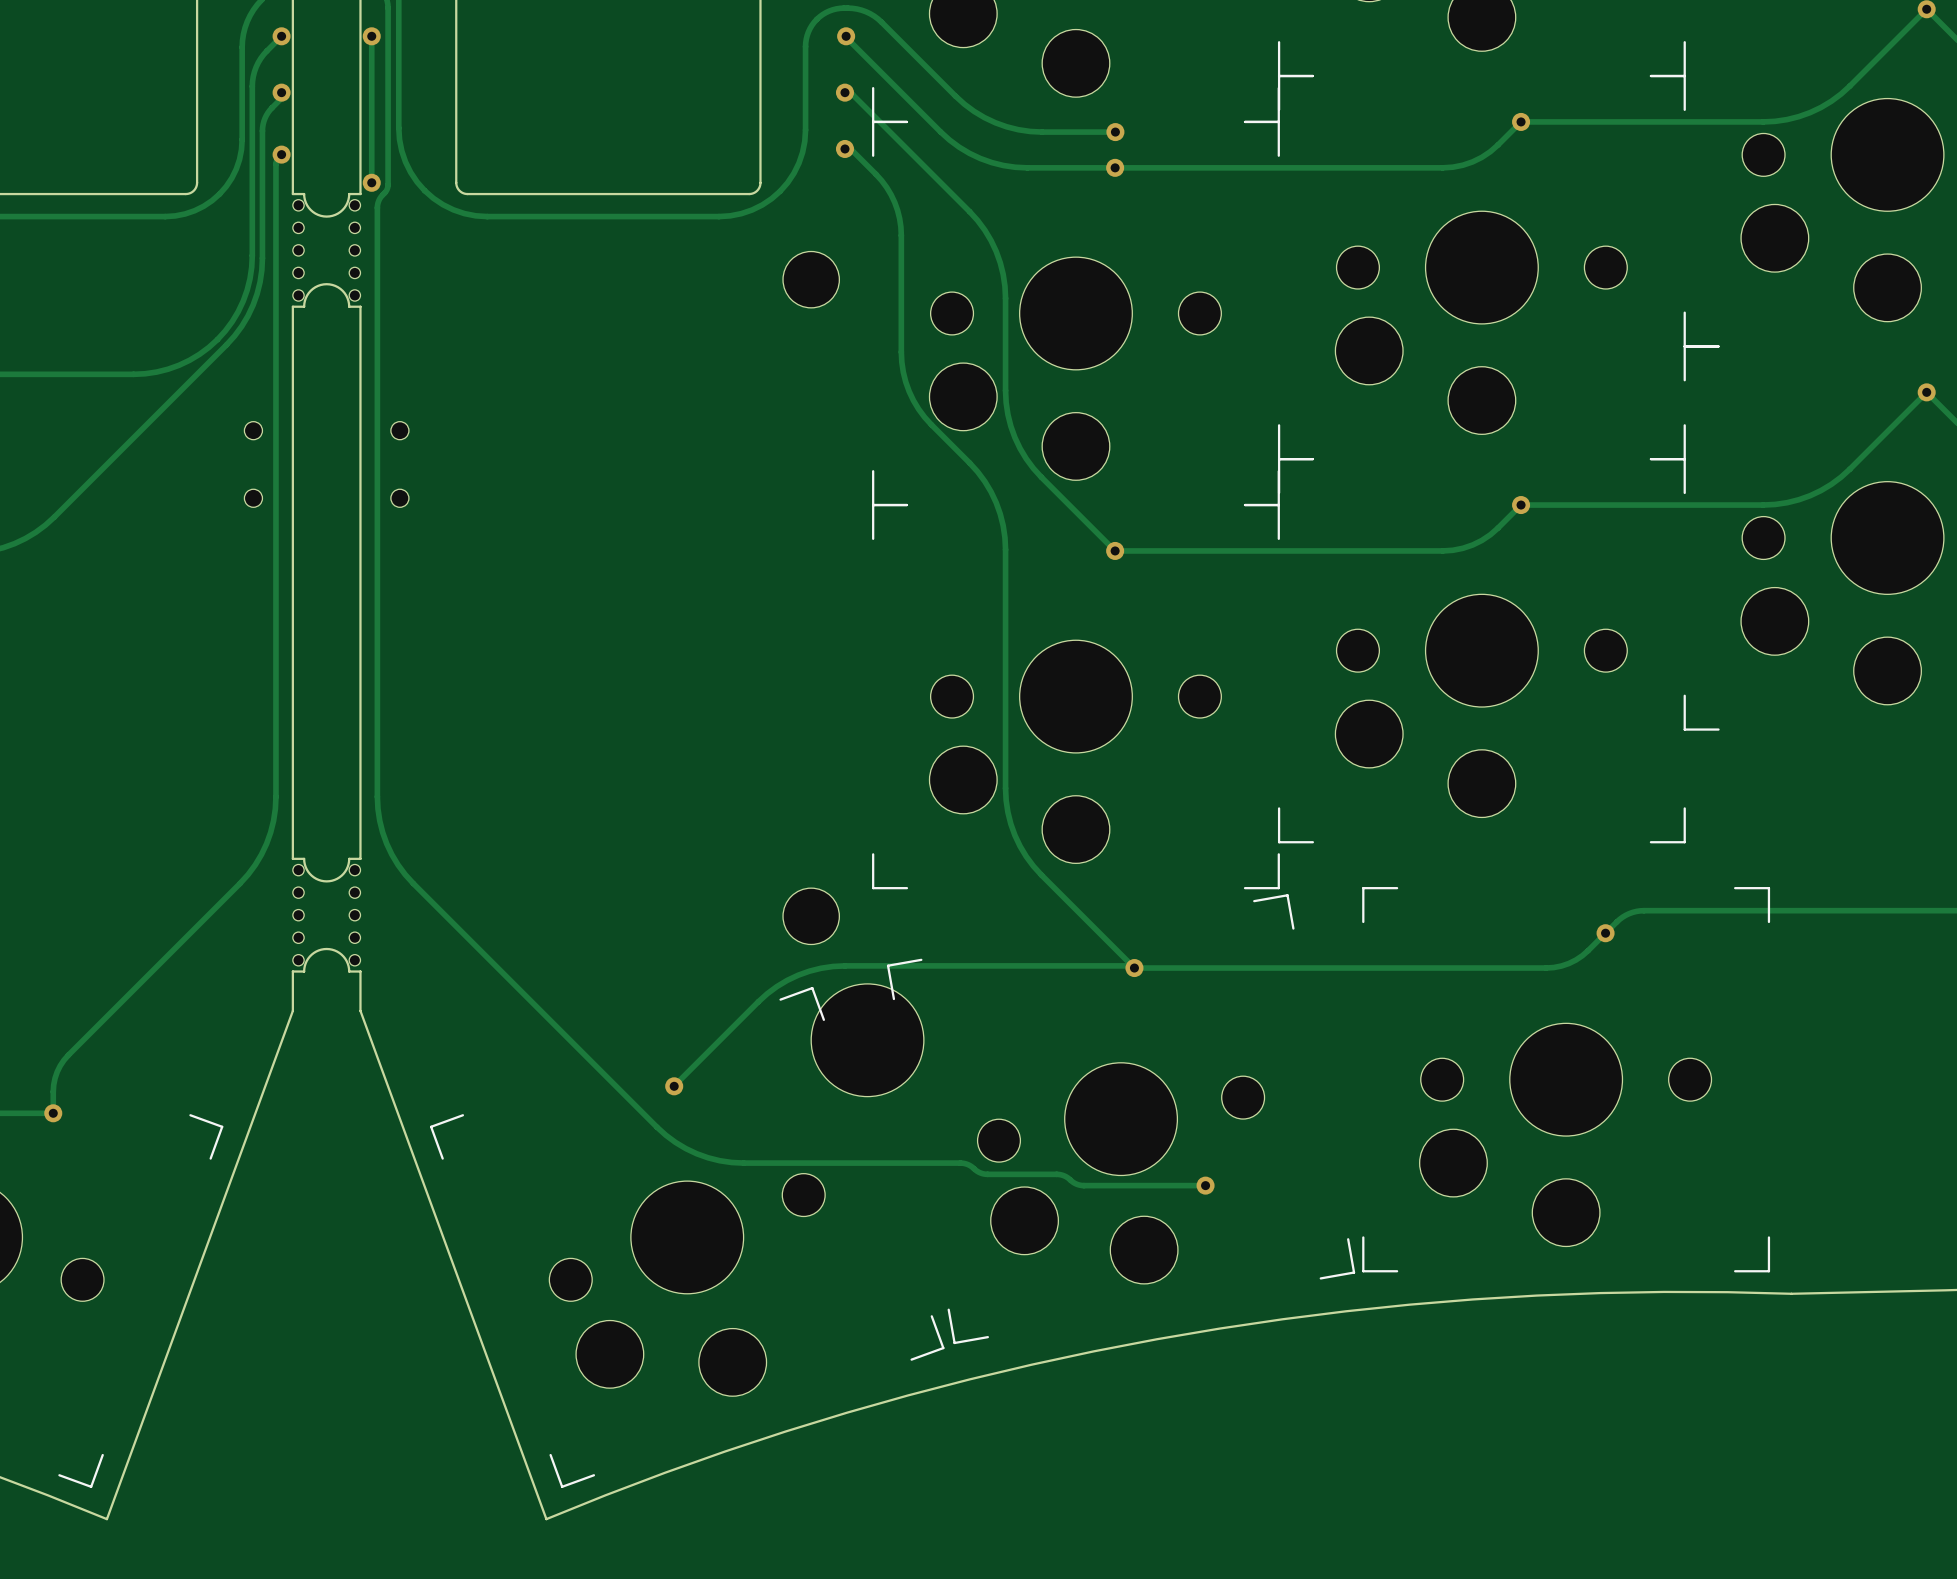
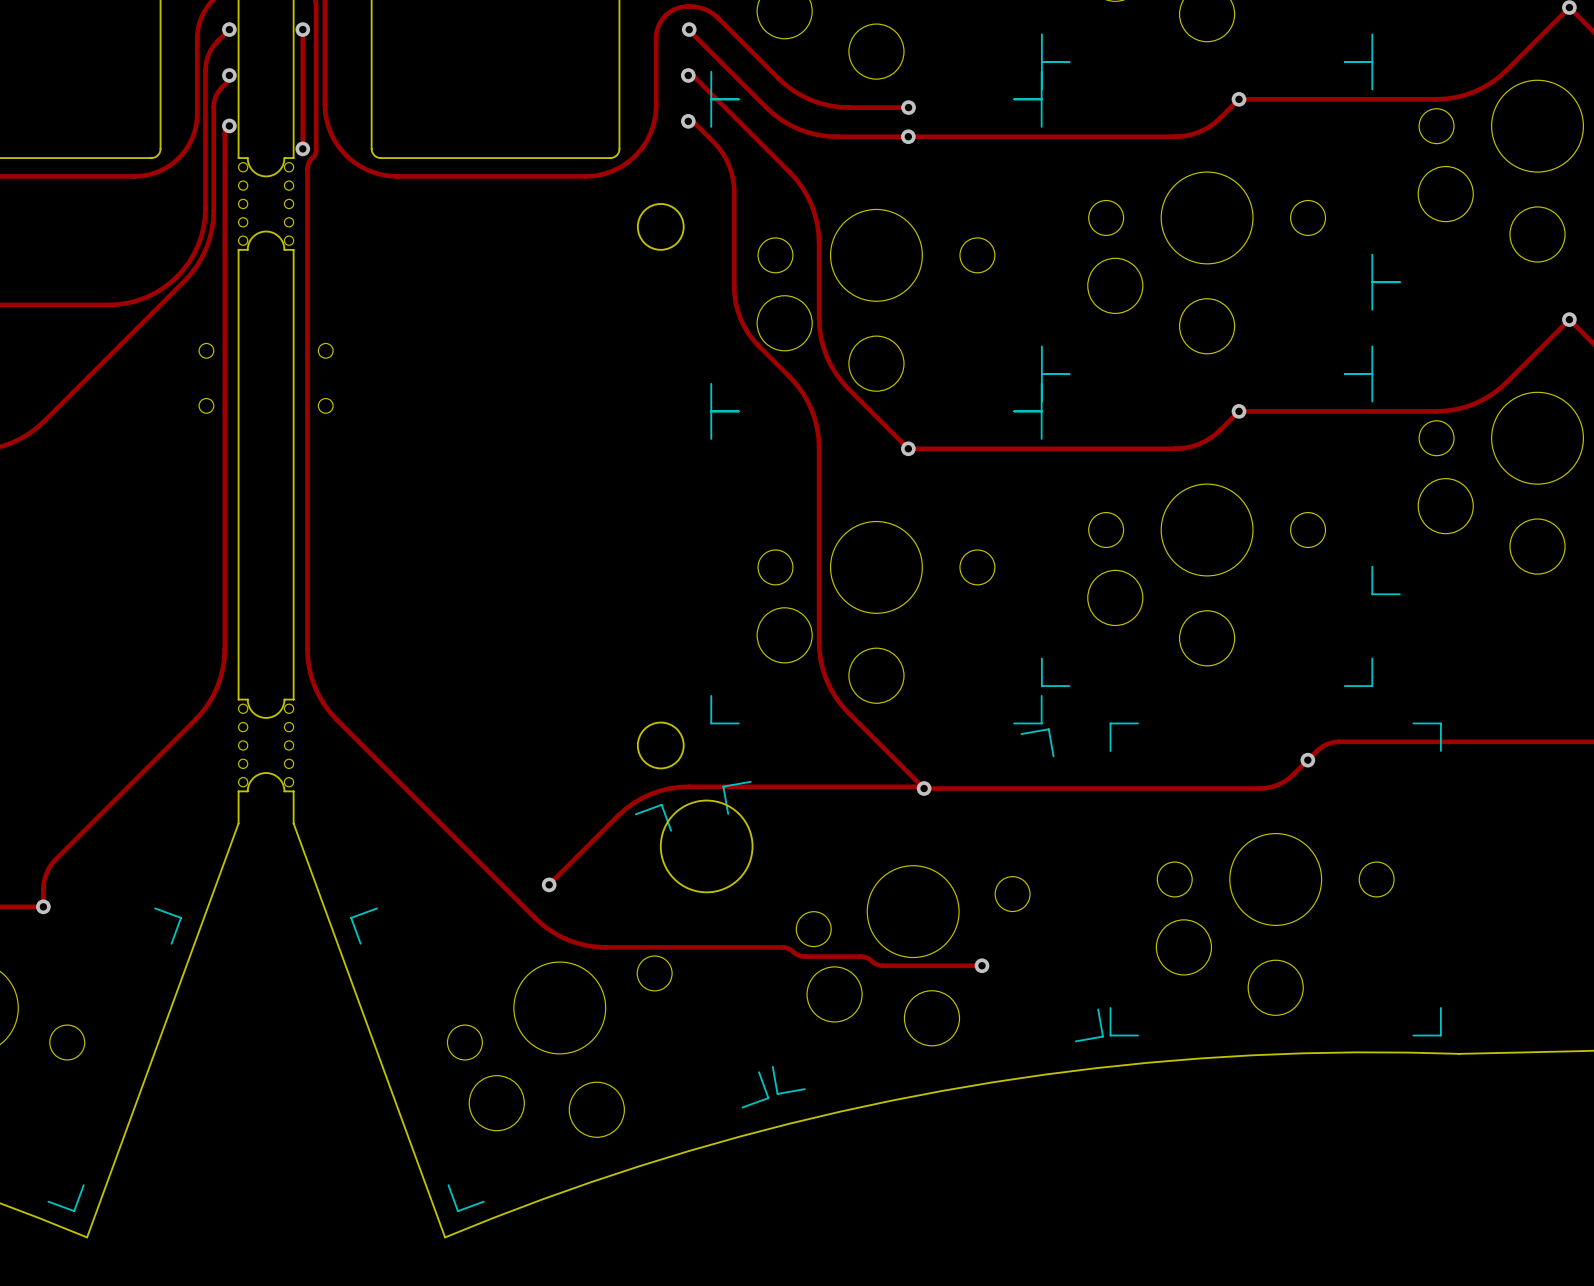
round board edge: none -> [636, 203, 685, 251]
part: (811, 279) -> none
round board edge: none -> [636, 721, 685, 770]
part: (811, 916) -> none
round board edge: none -> [659, 799, 754, 894]
part: (867, 1040) -> none

